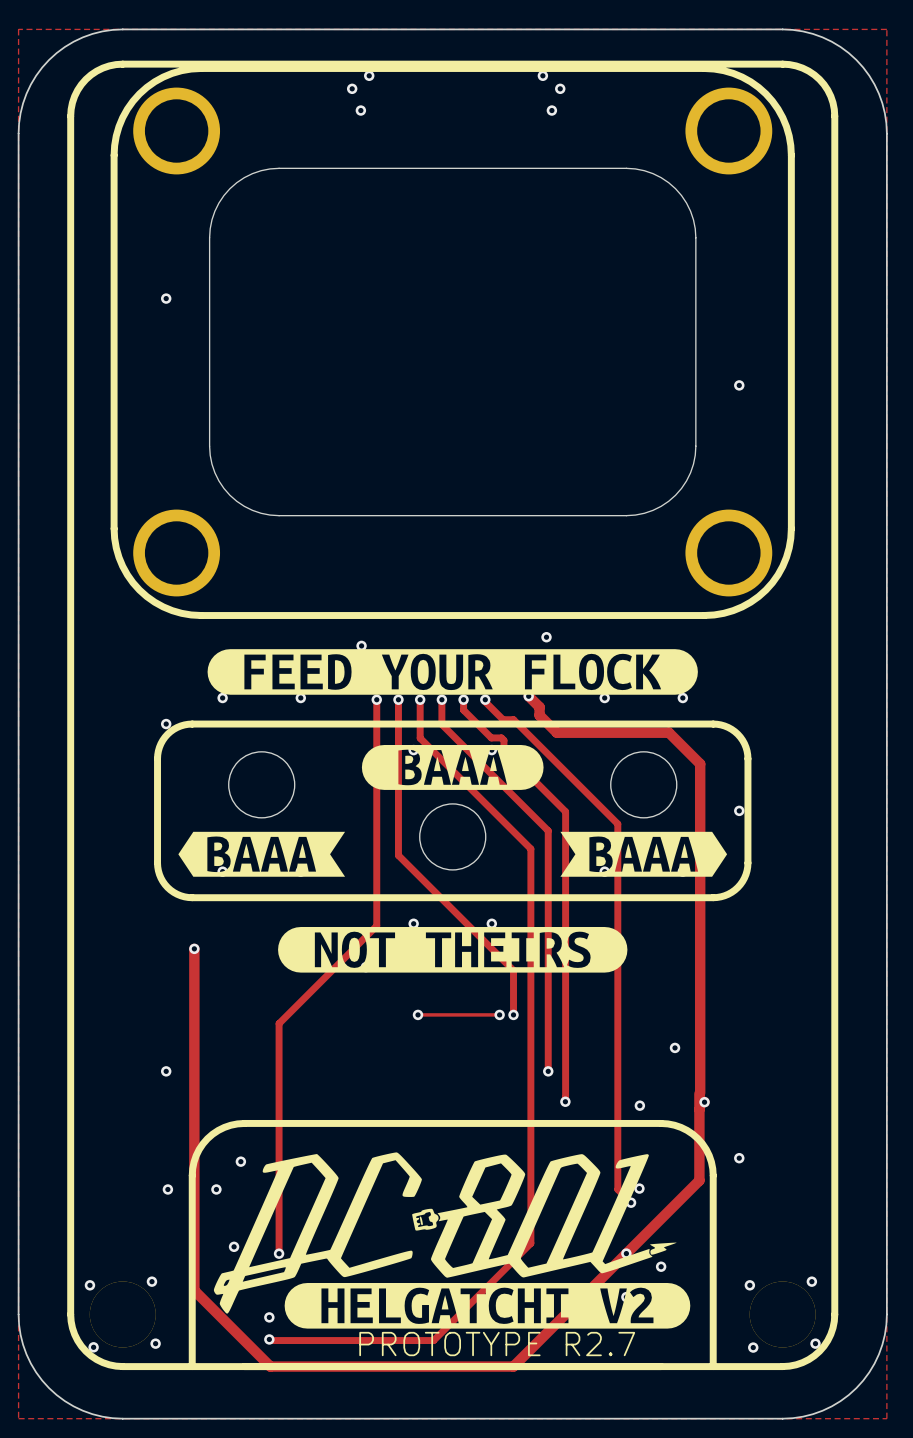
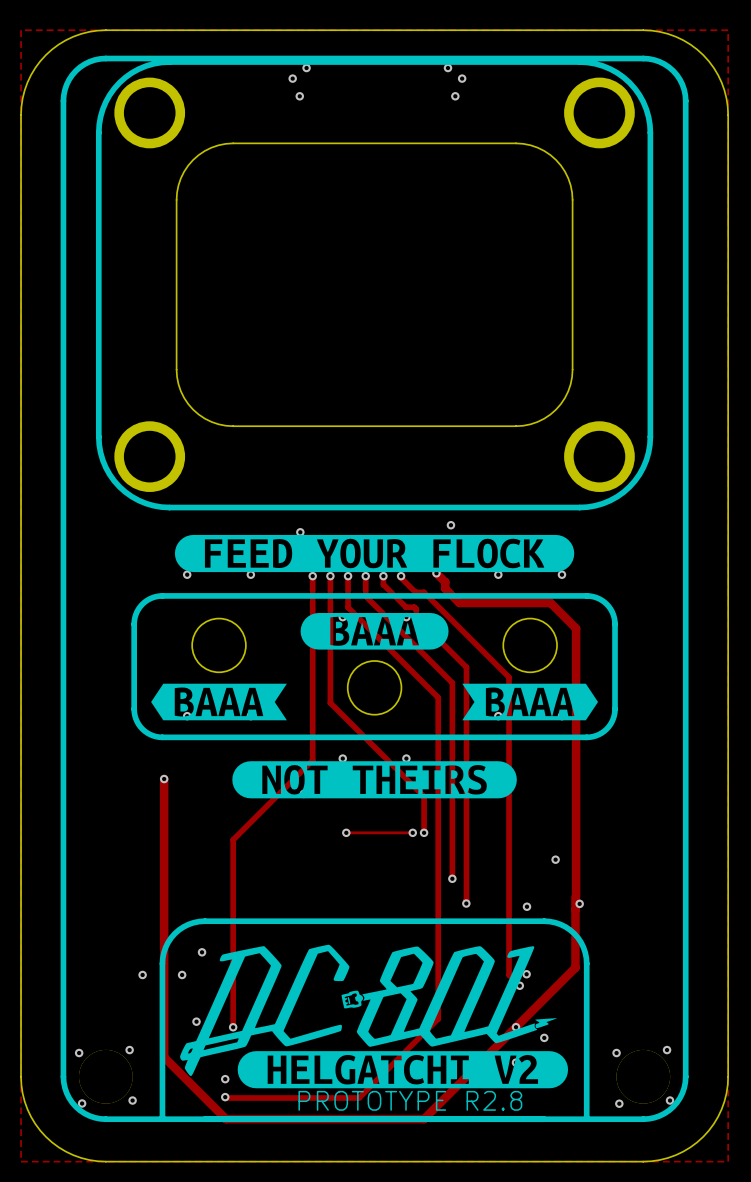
via: (166, 298) -> none
via: (739, 385) -> none
via: (166, 724) -> none
via: (739, 810) -> none
via: (166, 1071) -> none
via: (739, 1158) -> none
text: PROTOTYPE R2.7 (497, 1344) -> PROTOTYPE R2.8 (410, 1100)

